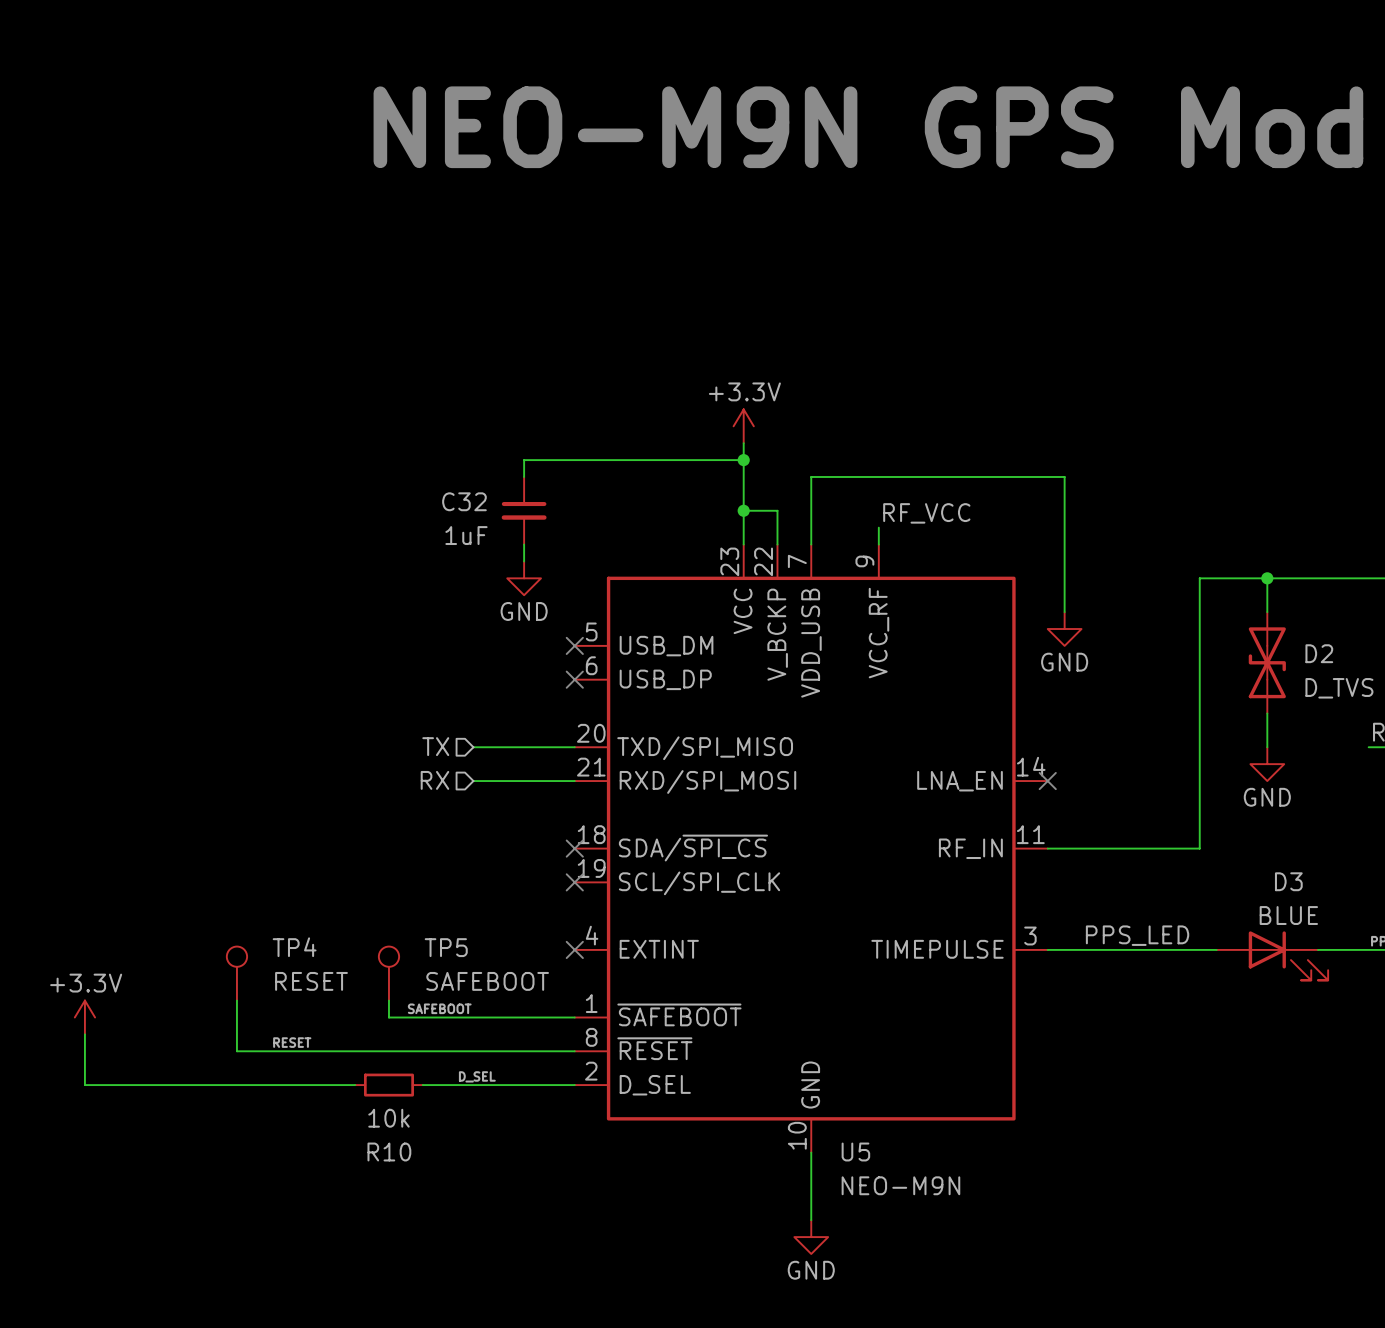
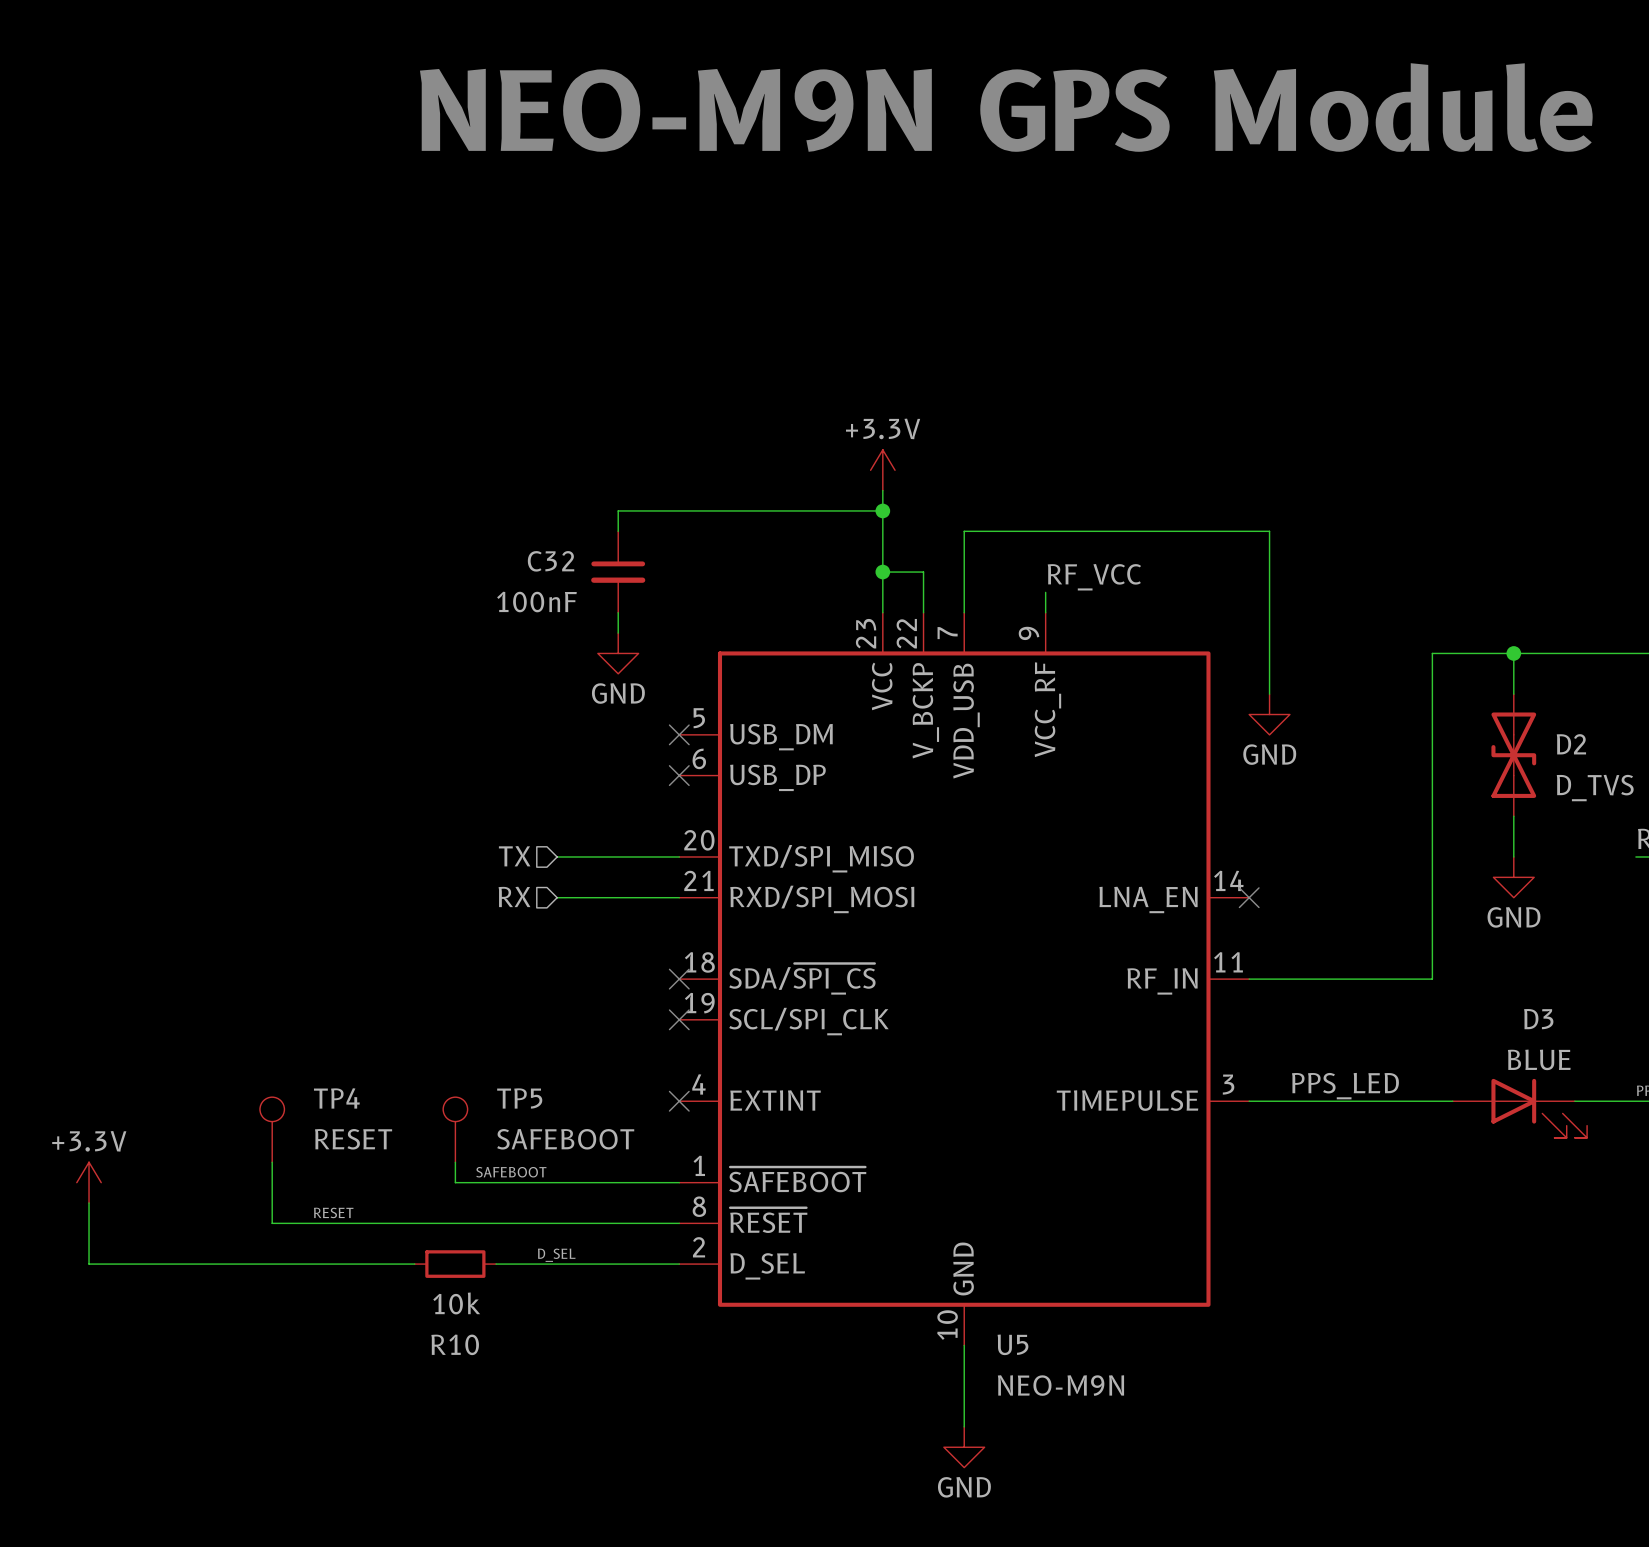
C32 value: 1uF (466, 535) -> 100nF (536, 602)

